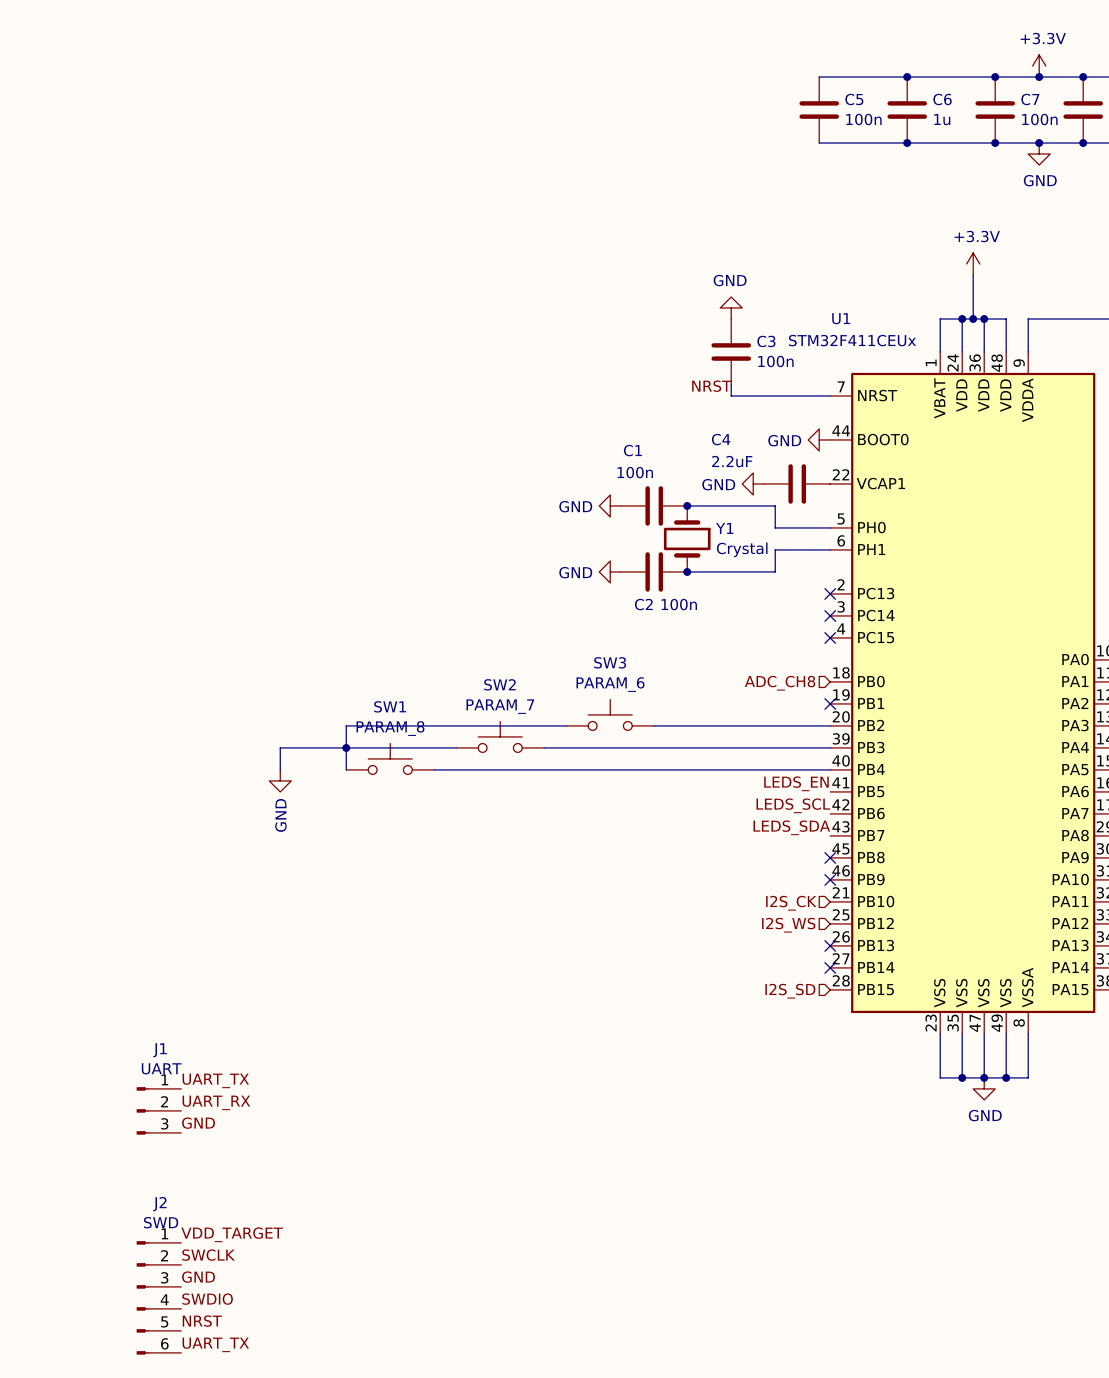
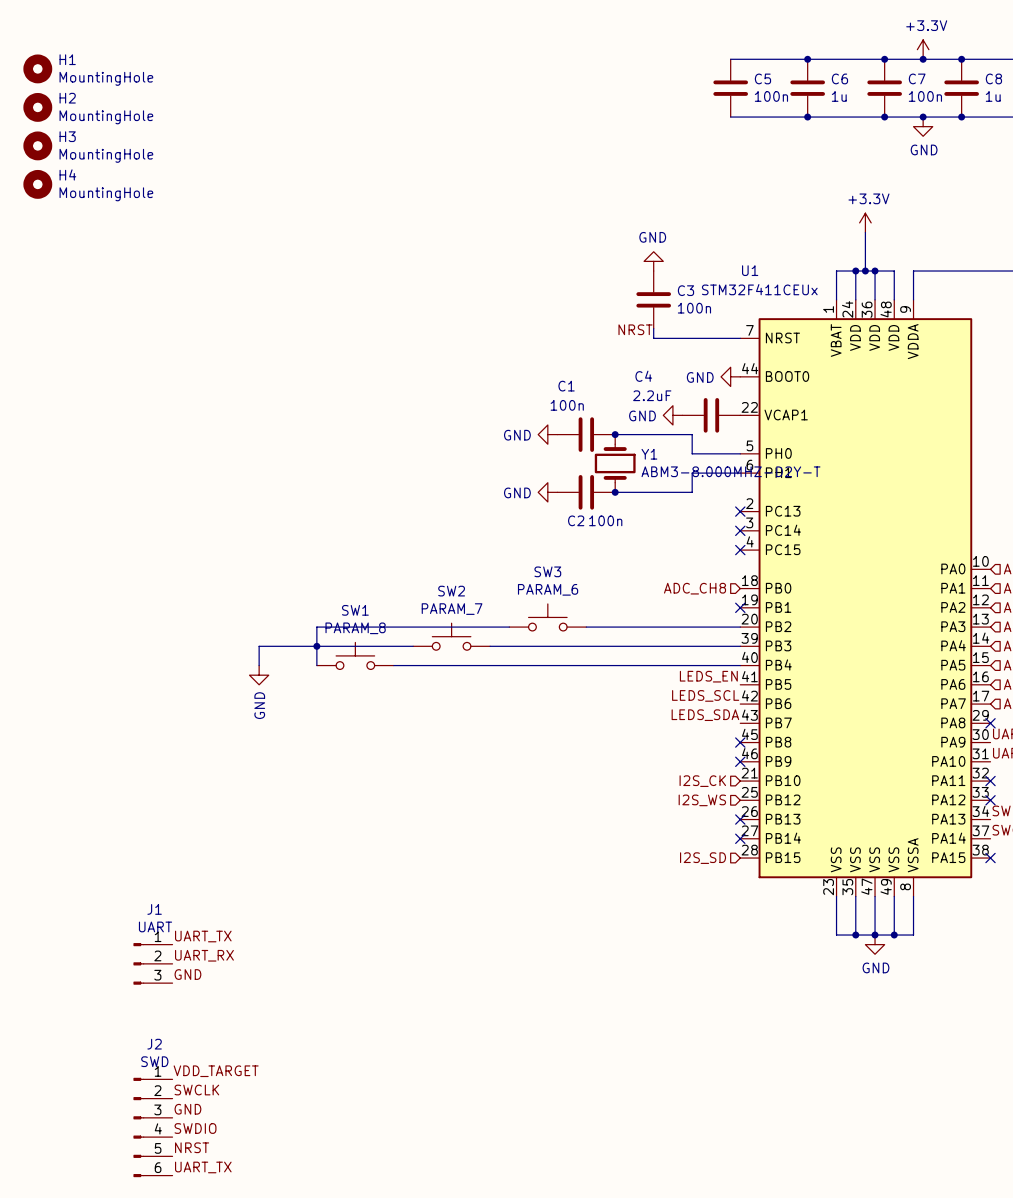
H1: none -> MountingHole (37, 68)
H2: none -> MountingHole (37, 107)
H3: none -> MountingHole (37, 145)
H4: none -> MountingHole (37, 184)
Y1 value: Crystal (742, 549) -> ABM3-8.000MHZ-D2Y-T (730, 471)

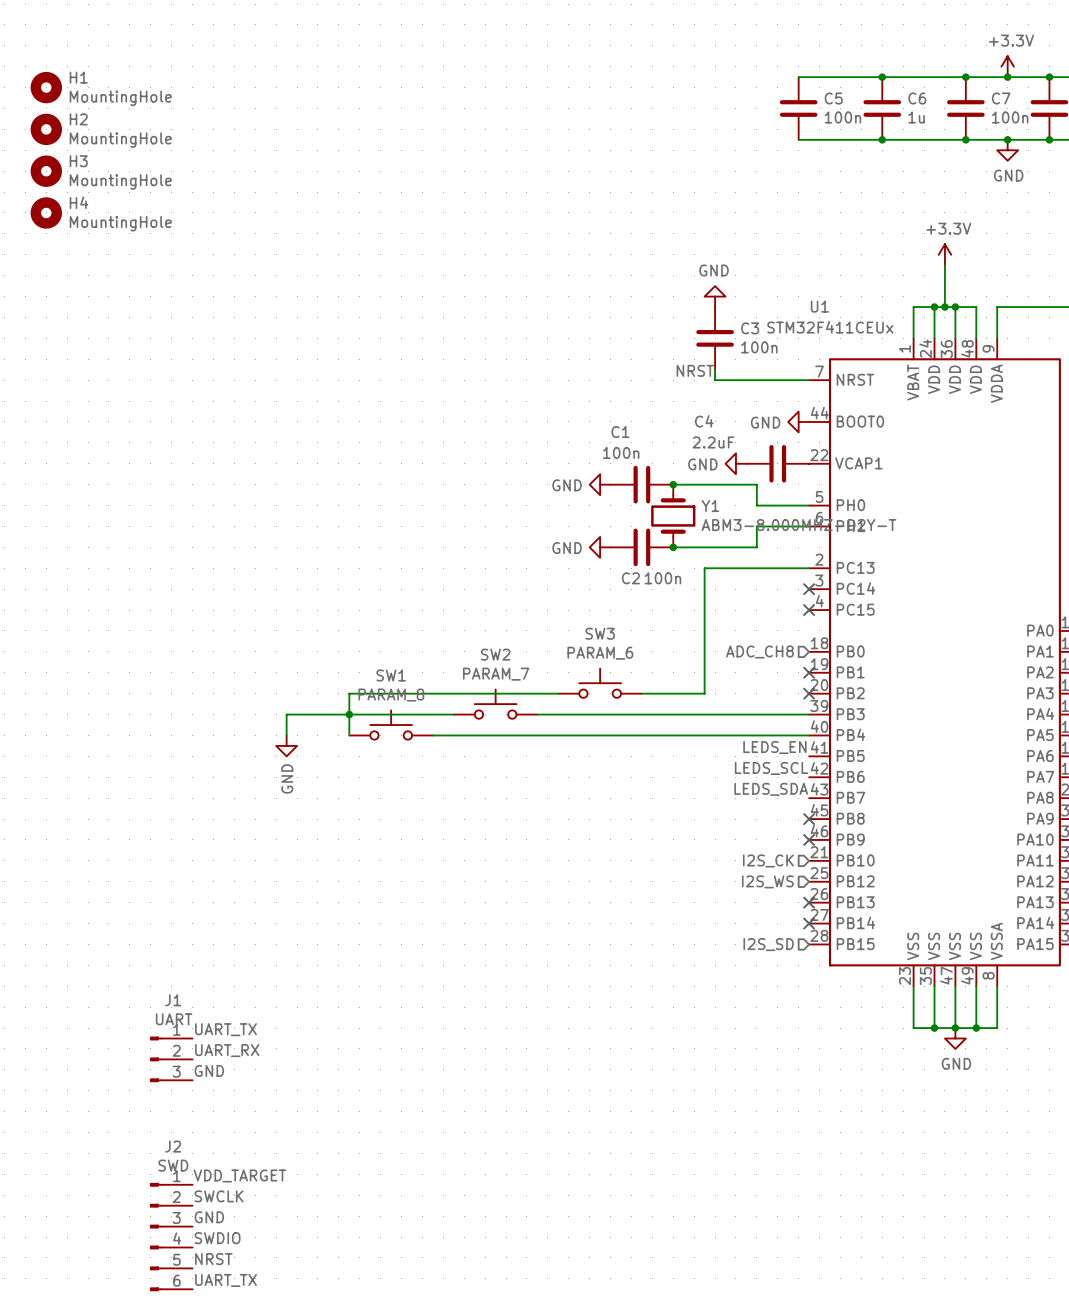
no-connect mark: (740, 511) -> none
wire: (644, 627) (740, 627) -> (704, 693) (704, 568) (809, 568)
no-connect mark: none -> (809, 693)

